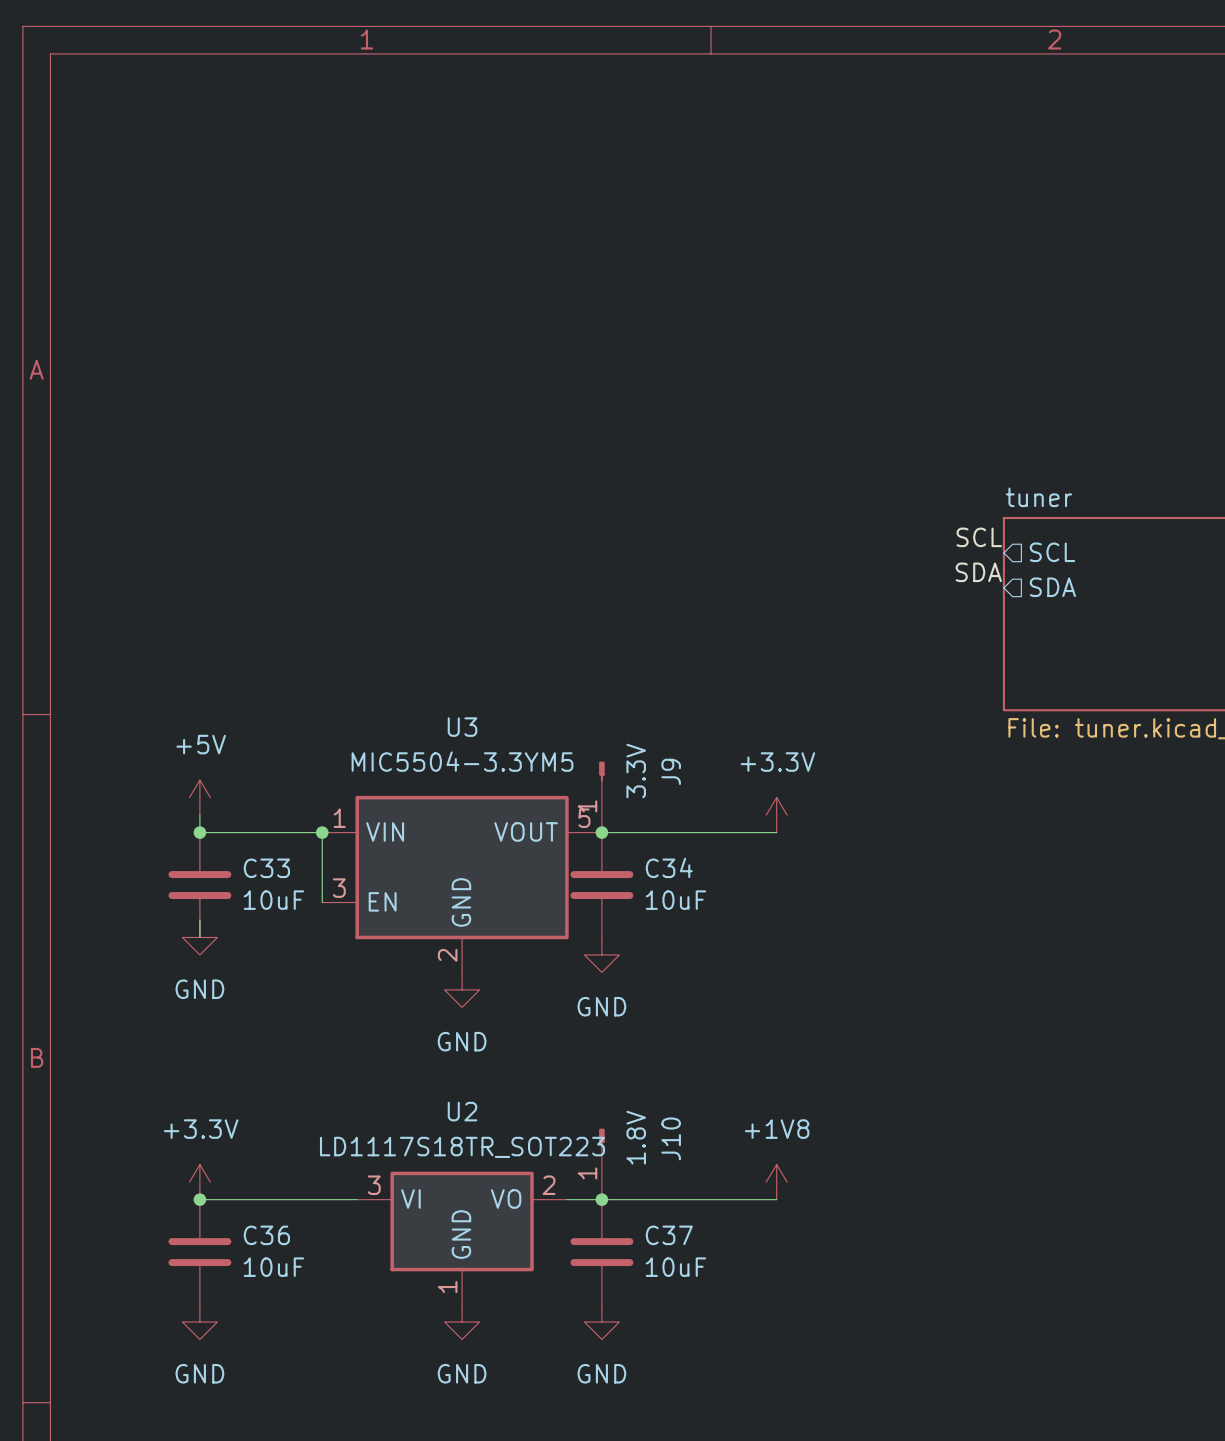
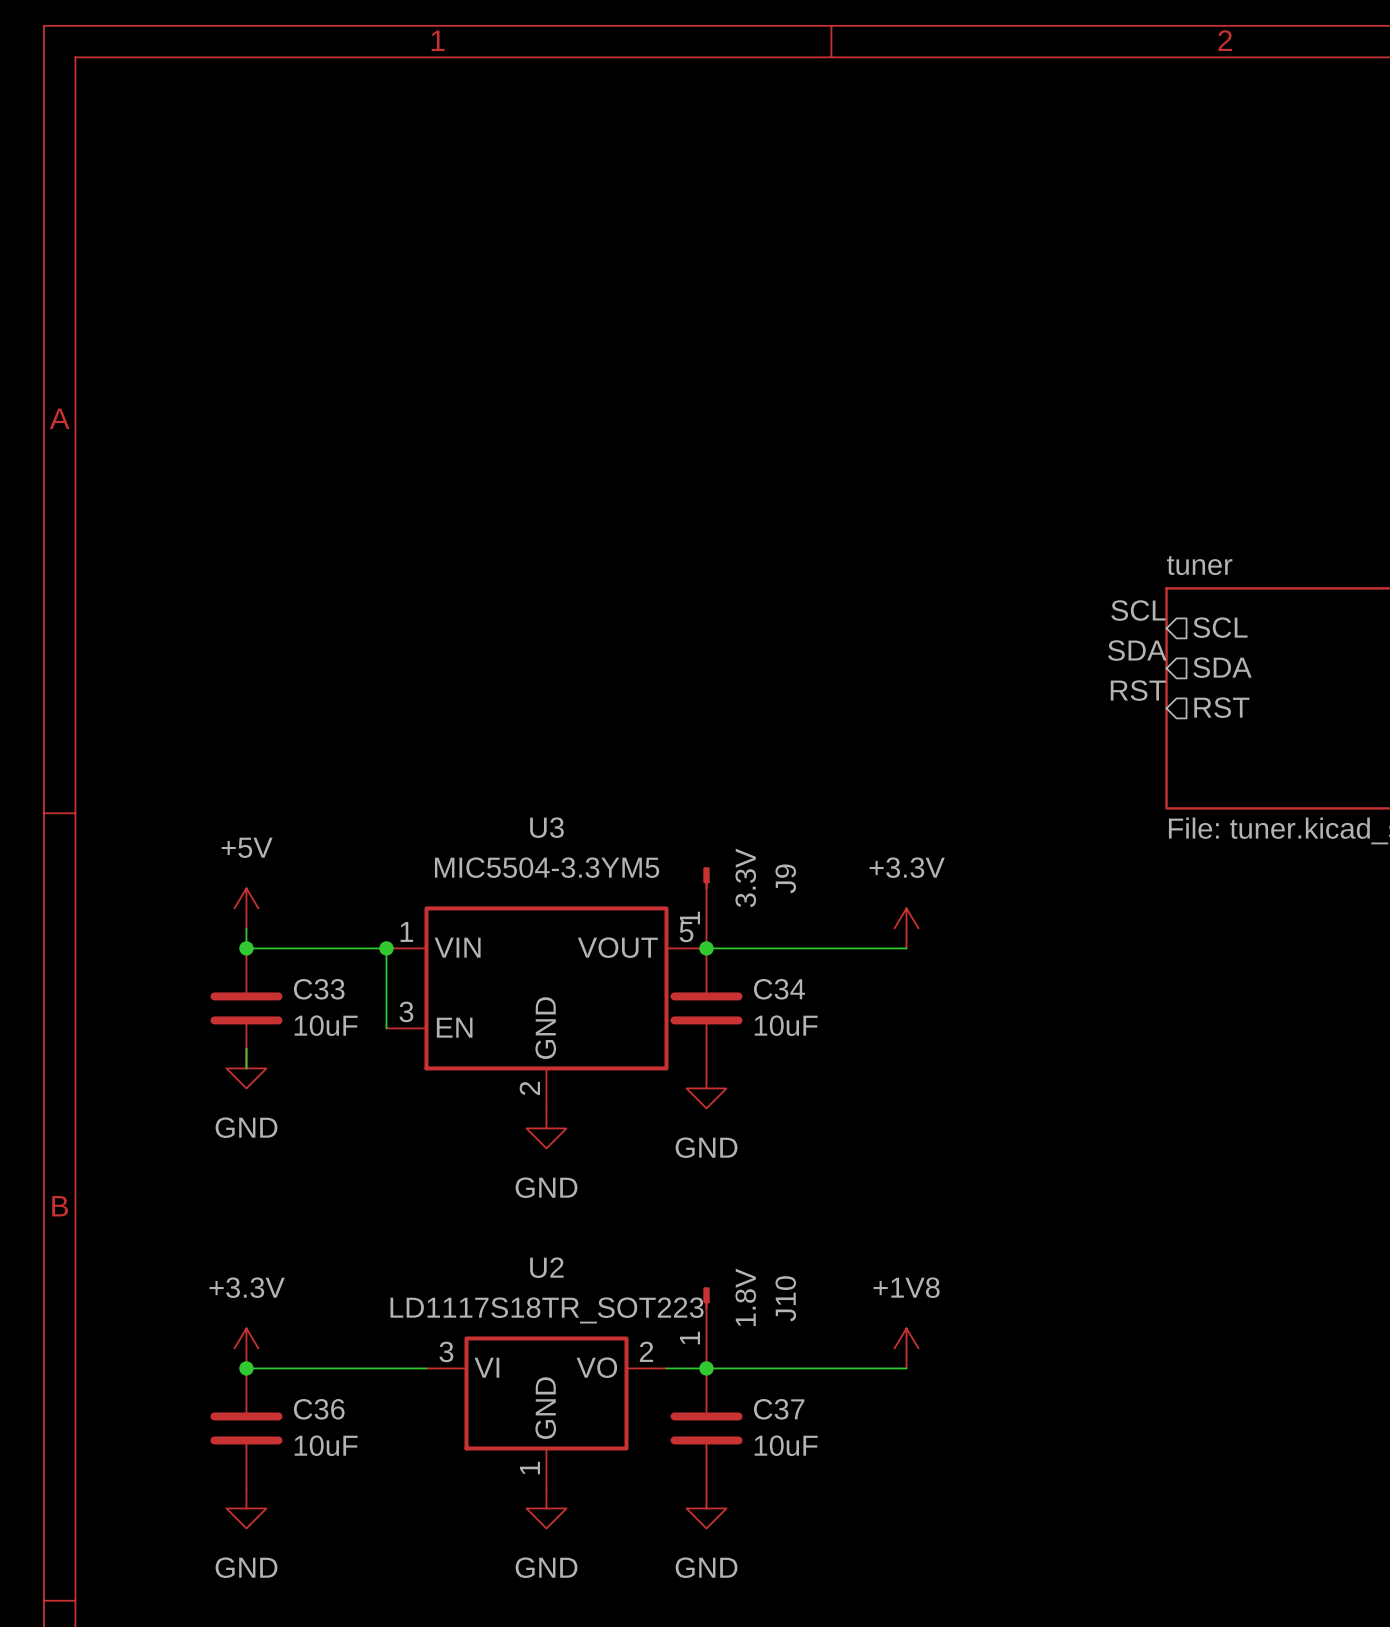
label: none -> RST (1138, 690)
sheet pin: none -> RST (1221, 707)

